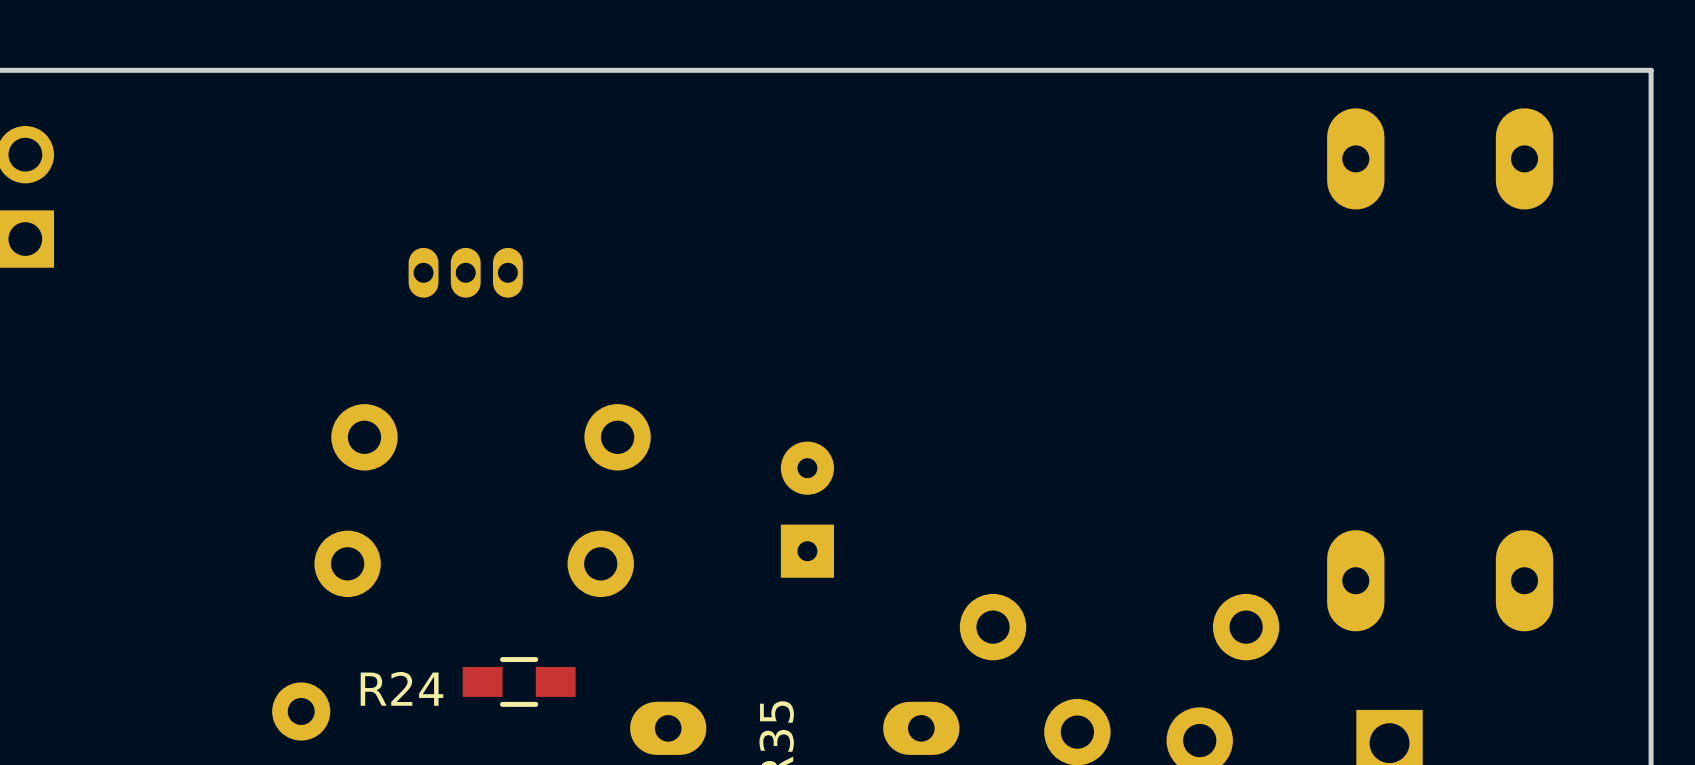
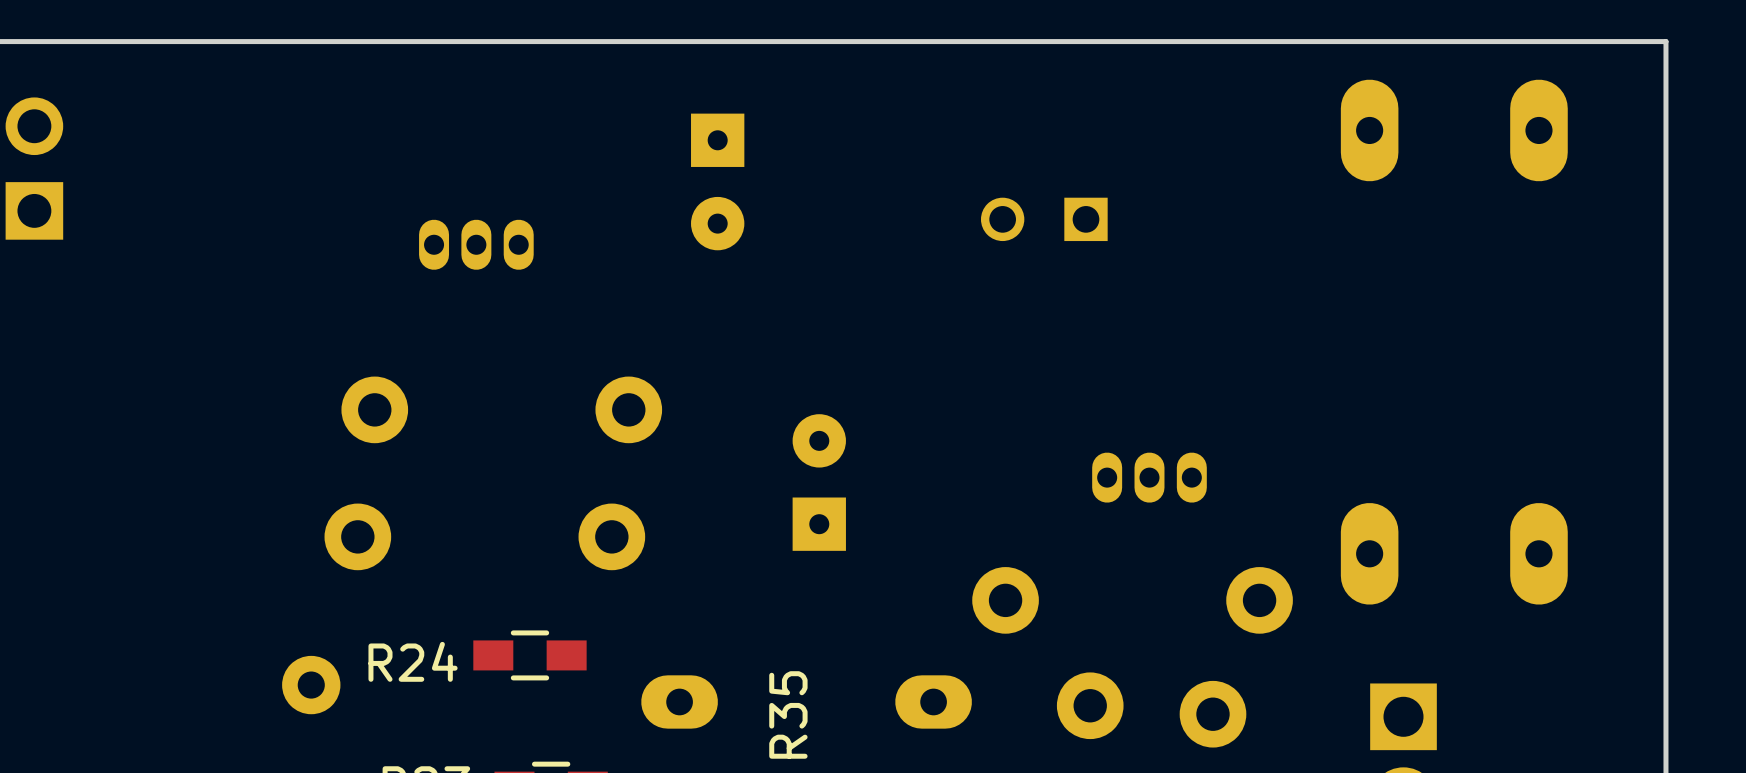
part: none -> (717, 181)
part: none -> (1044, 219)
part: none -> (1149, 477)

